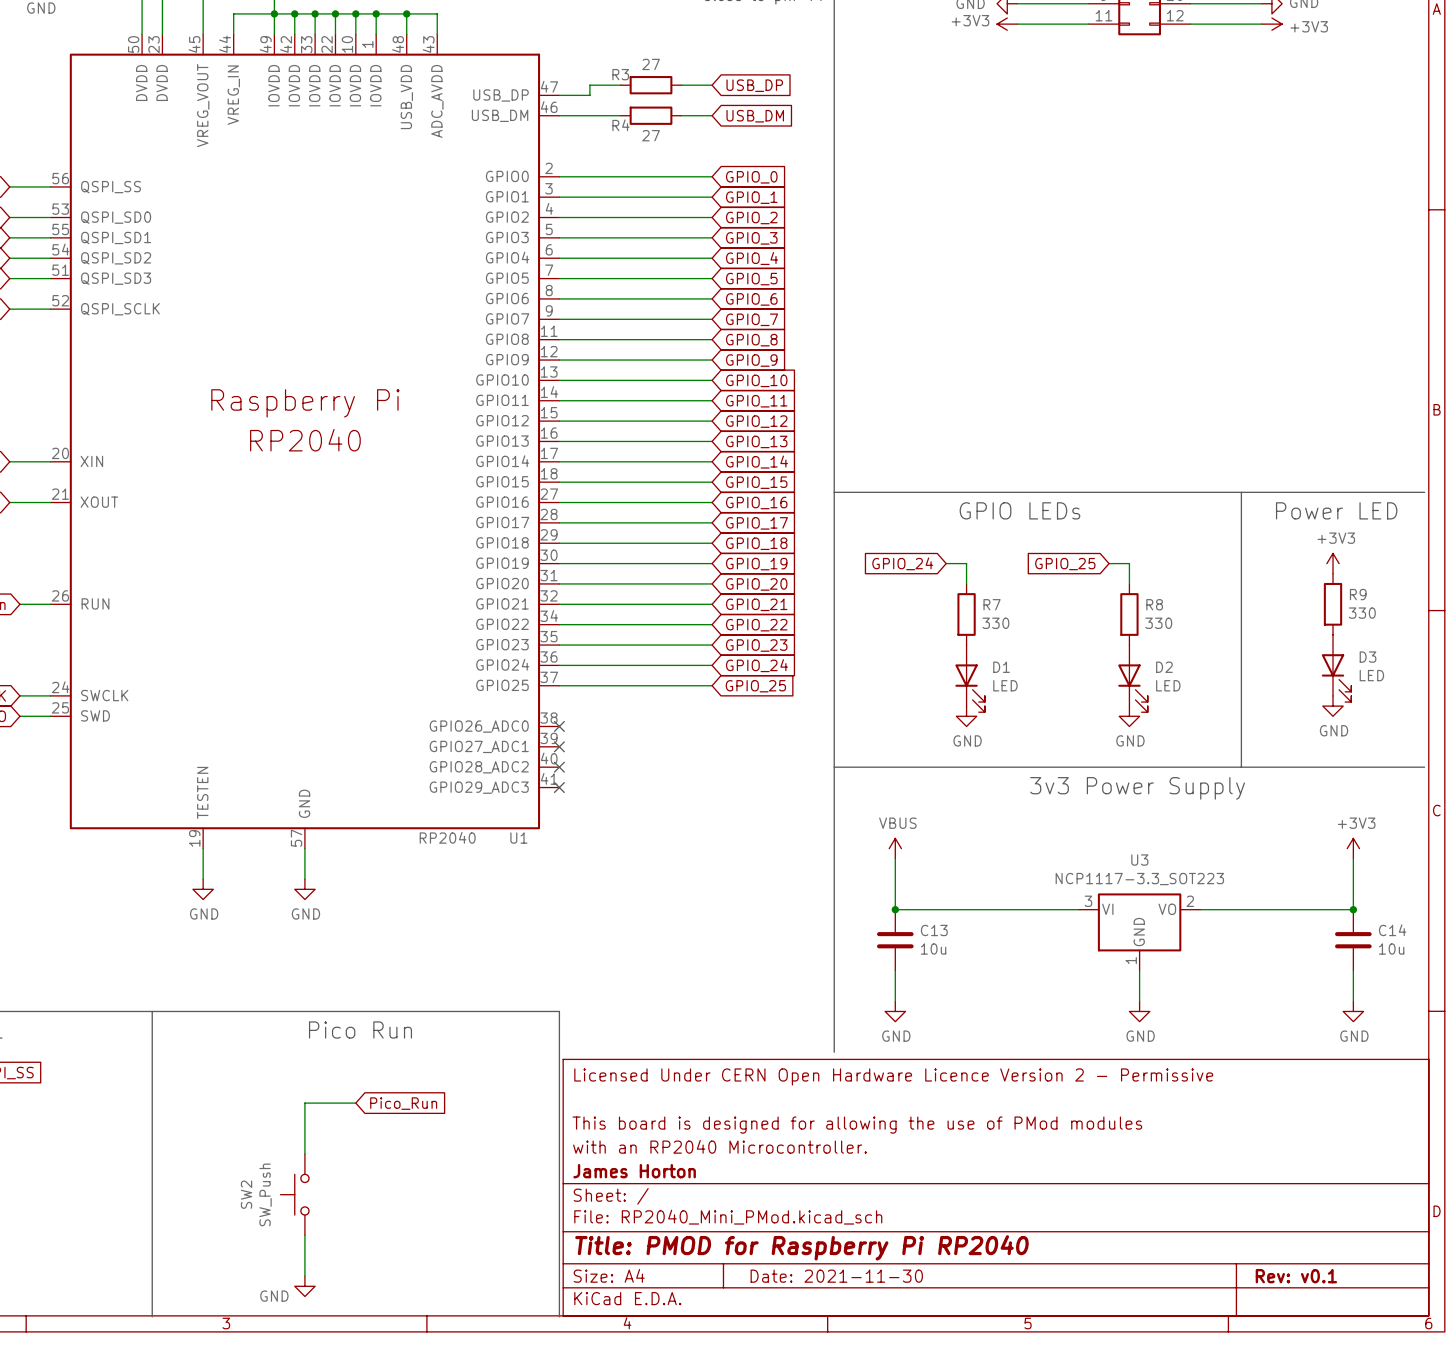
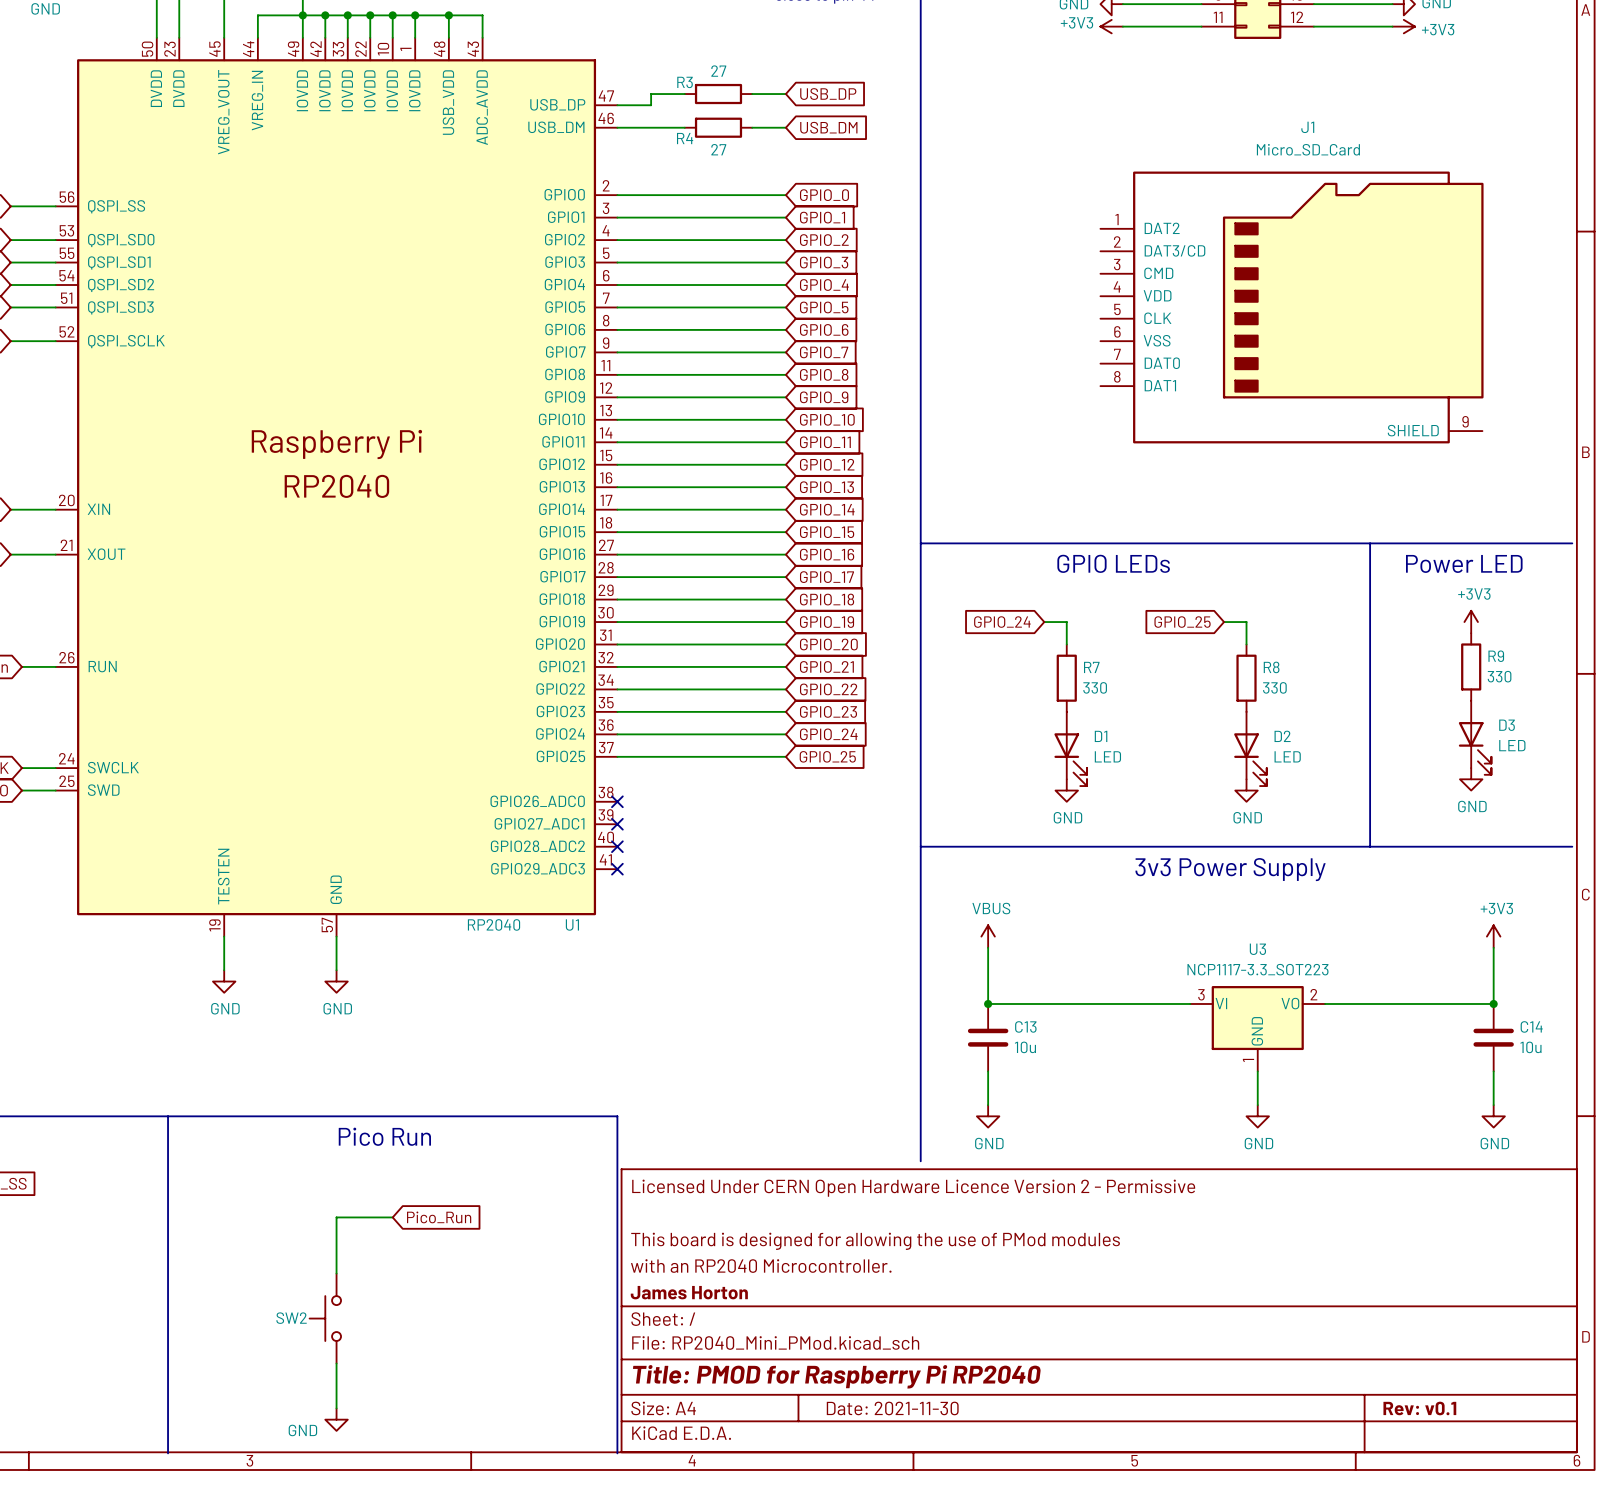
J1: none -> Micro_SD_Card (1292, 307)
SW2 name rotation: 0° (246, 1194) -> 90° clockwise (291, 1318)
SW2 value: SW_Push (265, 1194) -> none

